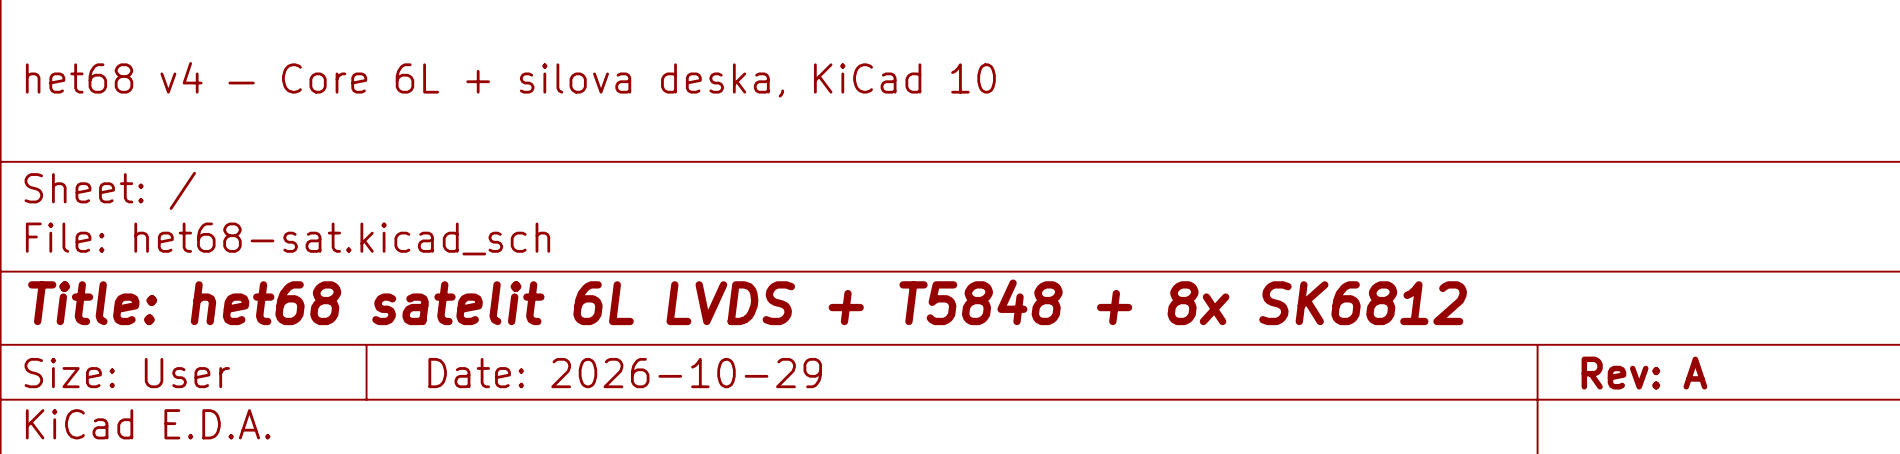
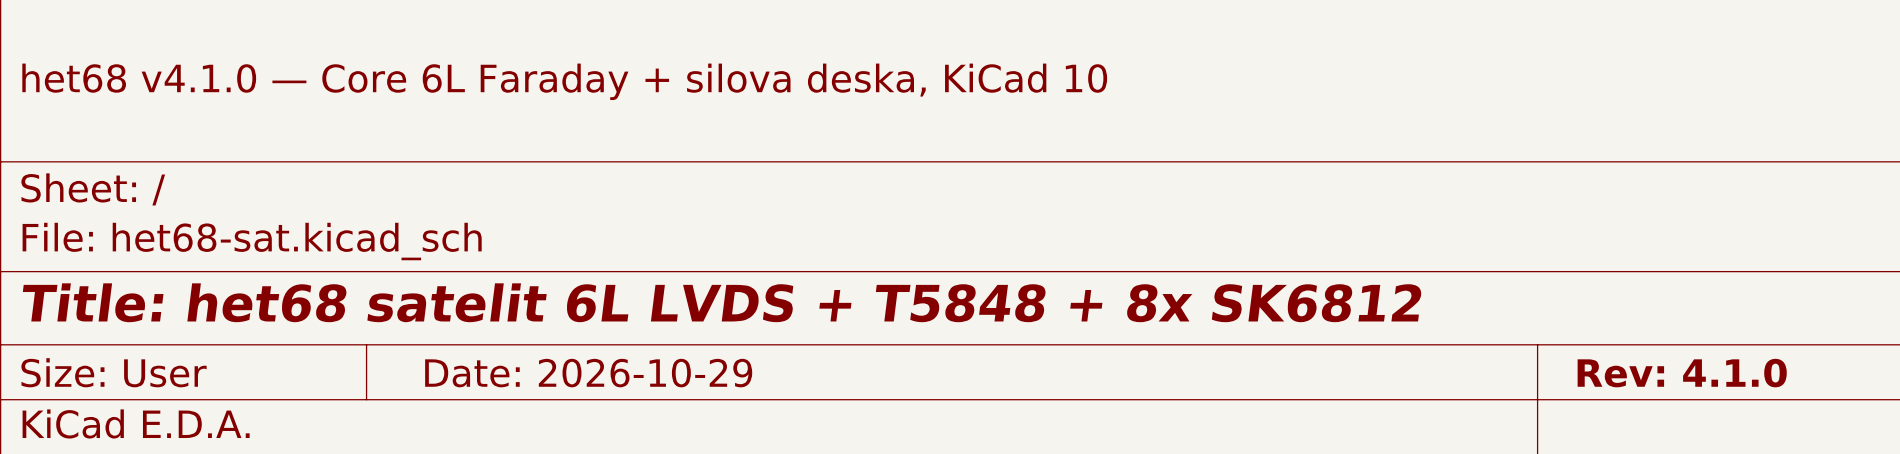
title block: het68 v4 — Core 6L + silova deska, KiCad 10 (510, 79) -> het68 v4.1.0 — Core 6L Faraday + silova deska, KiCad 10 (564, 81)
title block: Rev: A (1644, 373) -> Rev: 4.1.0 (1682, 373)

